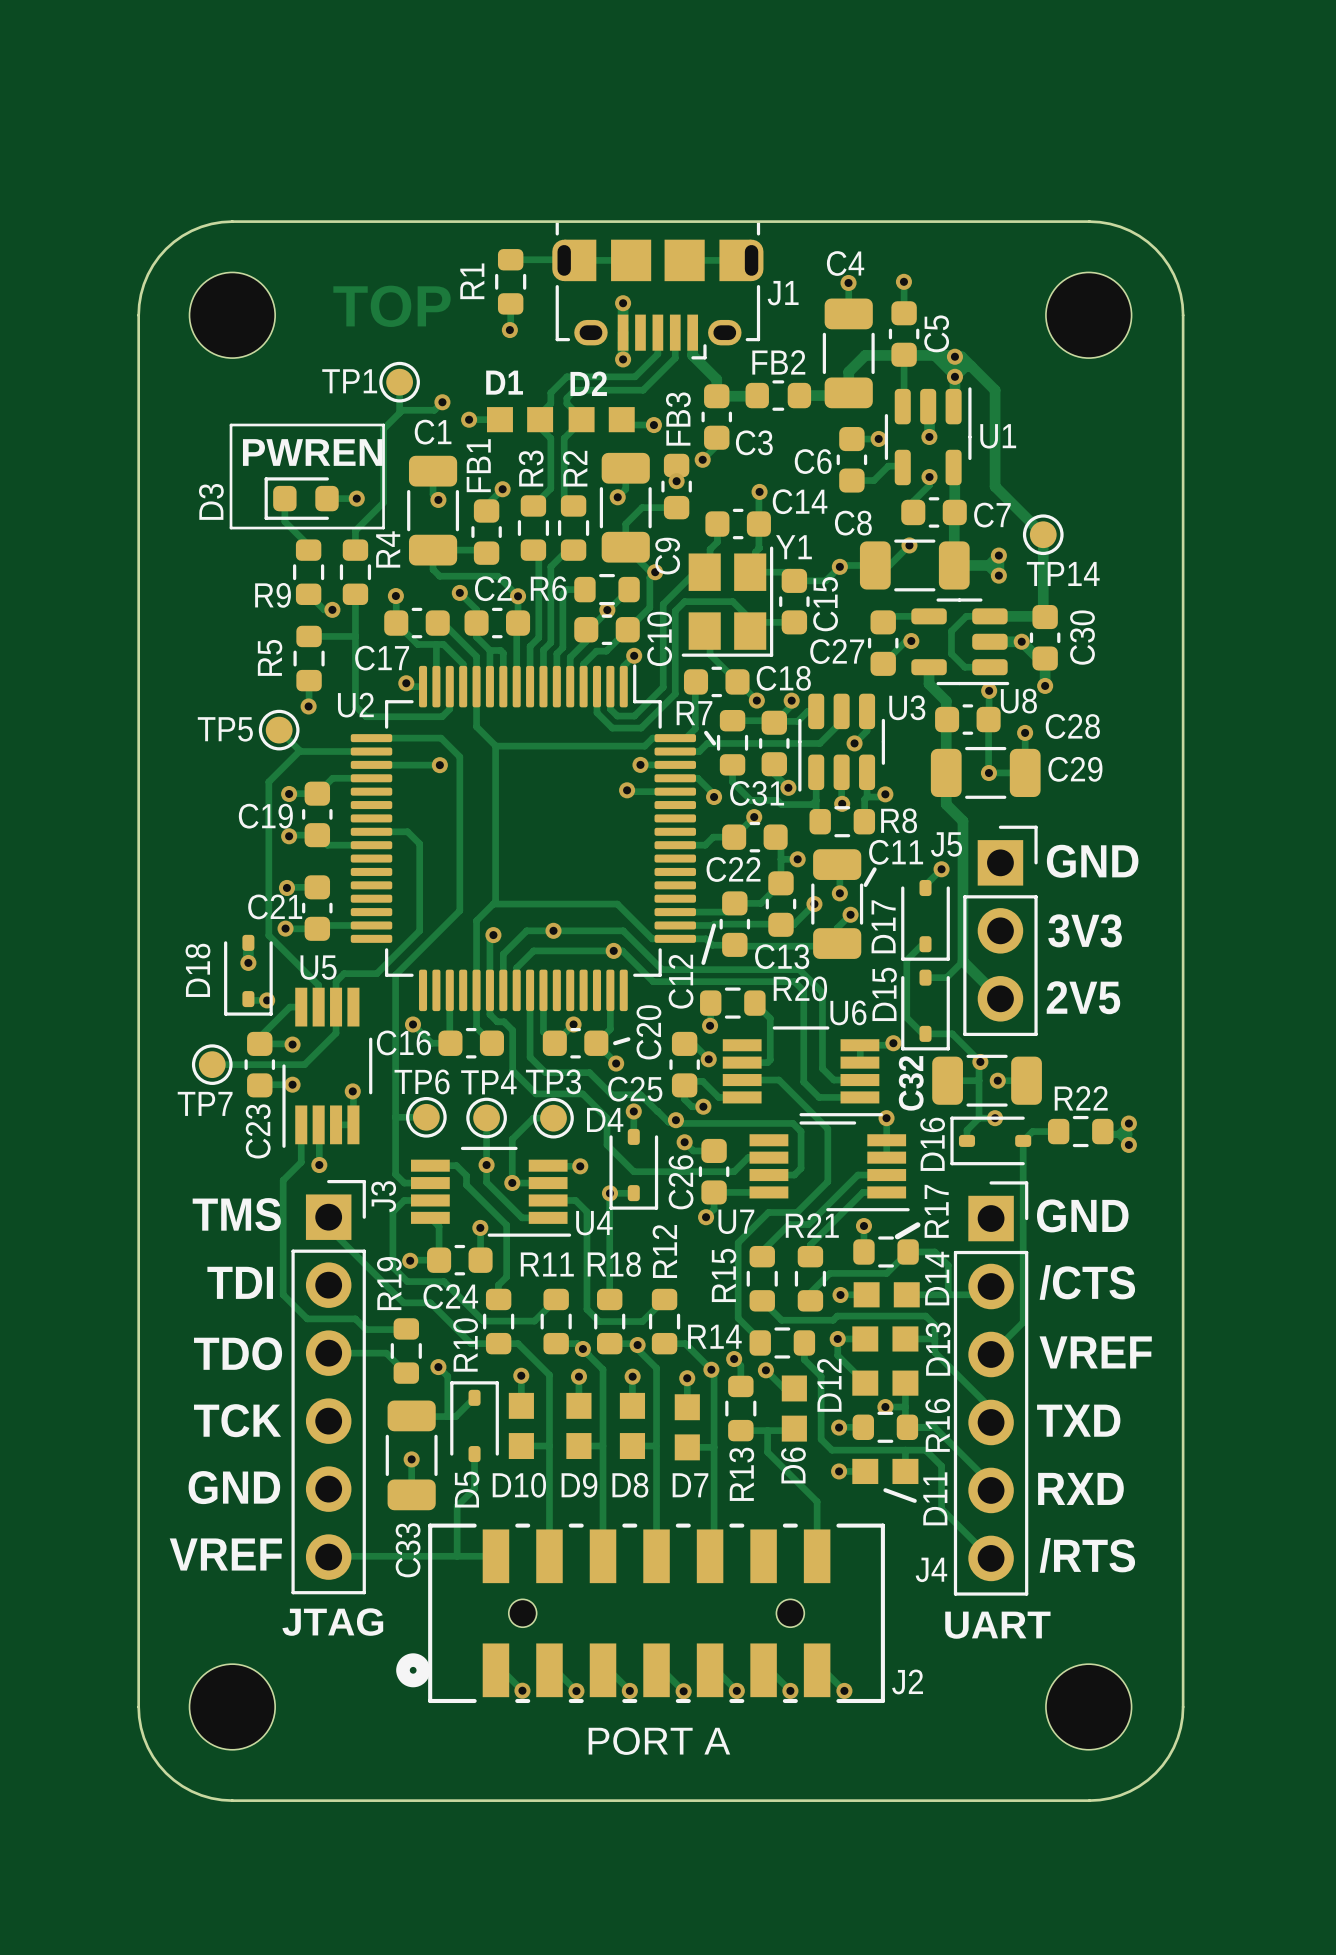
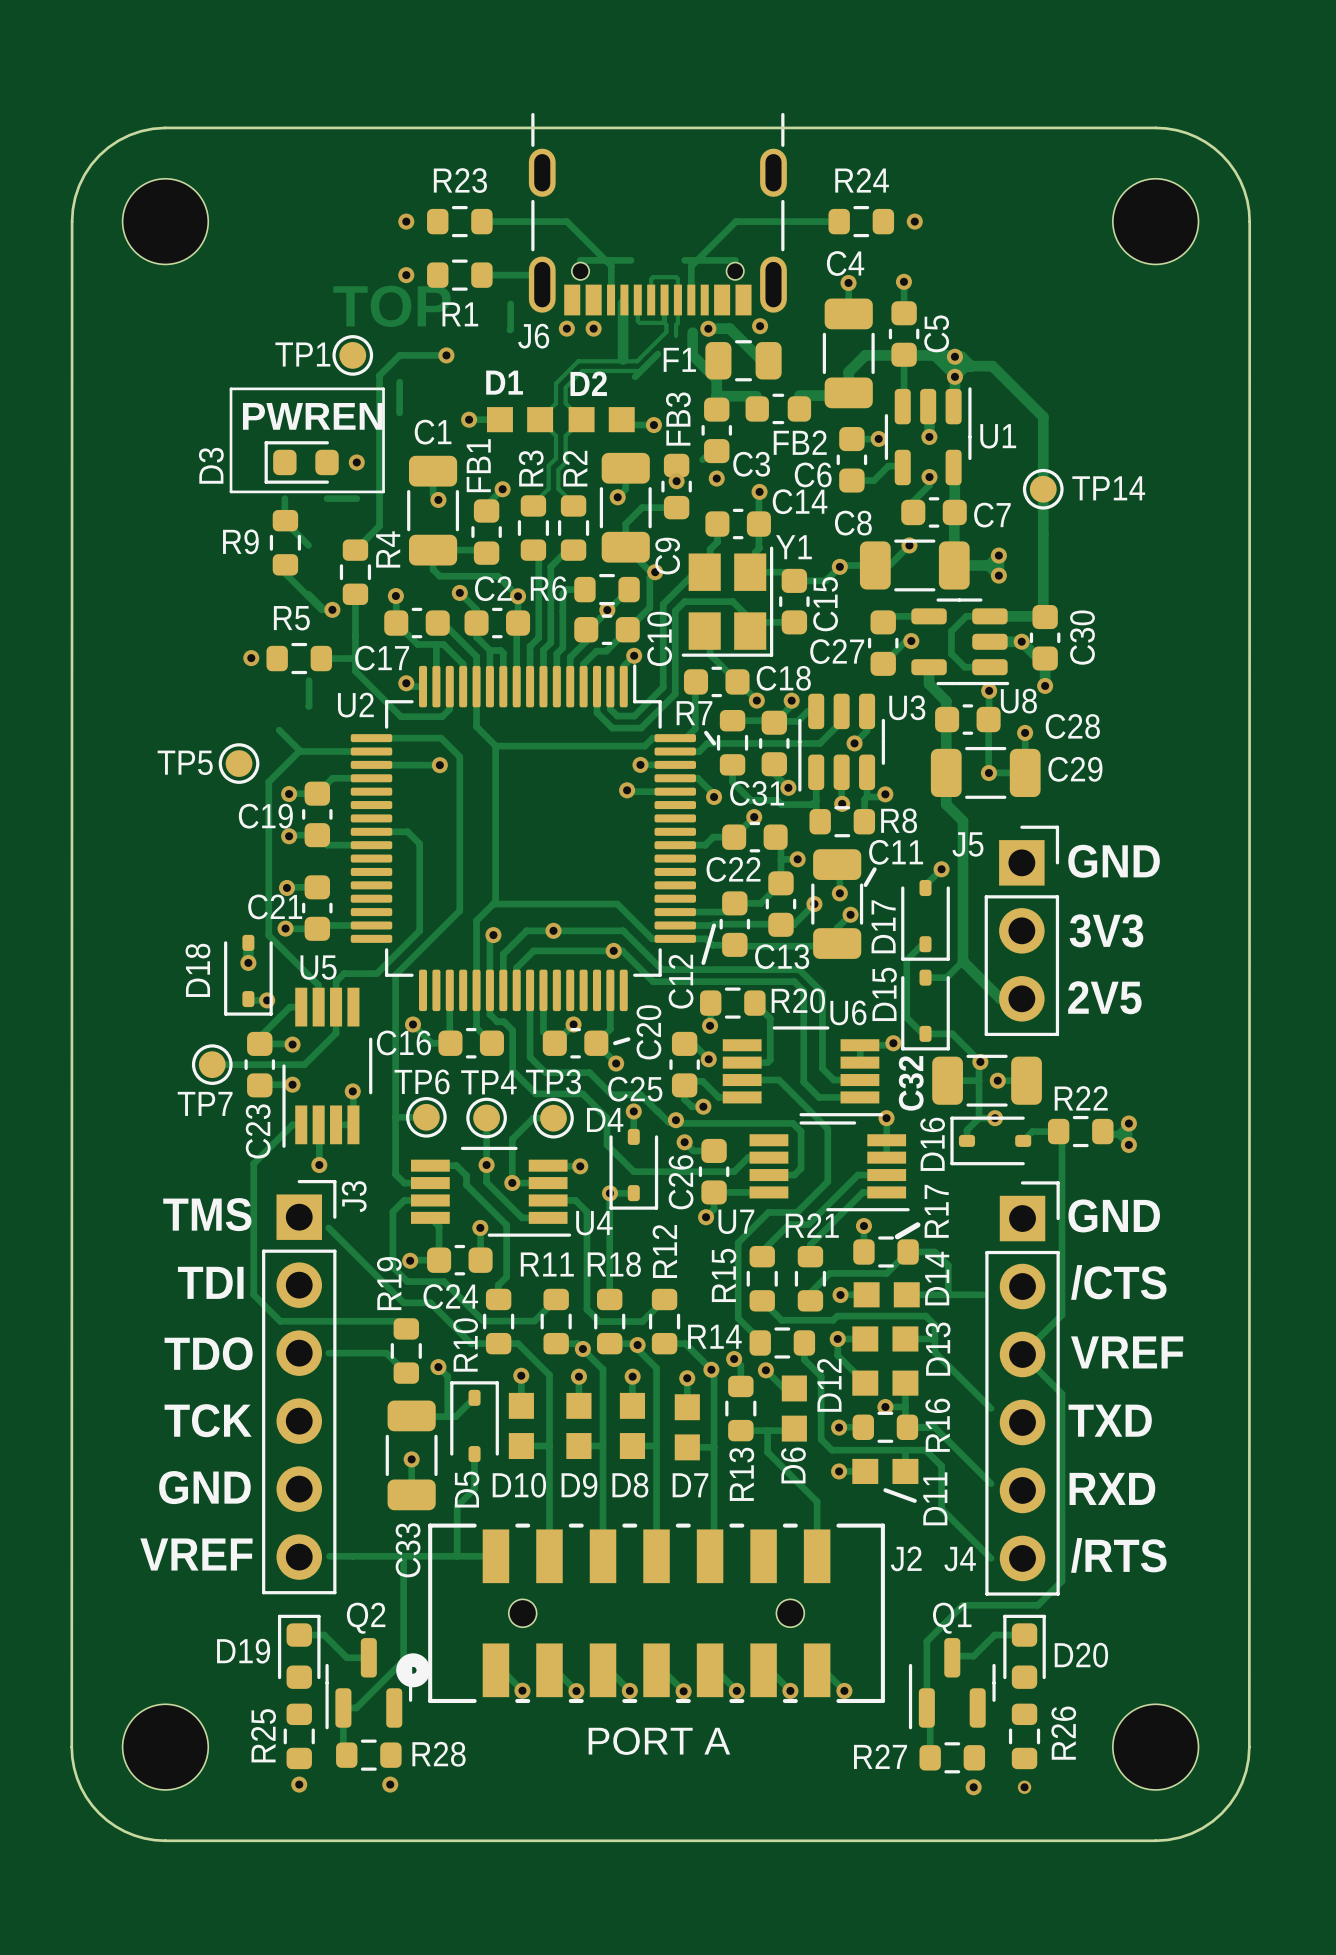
J6: none -> (657, 214)
board edge: (232, 221) (1089, 221) (1110, 223) (1139, 235) (1155, 249) (1168, 265) (1180, 294) (1183, 315) (1183, 1706) (1180, 1727) (1168, 1756) (1155, 1773) (1139, 1786) (1120, 1795) (1089, 1800) (232, 1800) (201, 1795) (182, 1786) (166, 1773) (153, 1756) (141, 1727) (138, 1706) (138, 315) (141, 294) (147, 274) (166, 249) (191, 230) (211, 223) (232, 221) -> (165, 127) (140, 131) (129, 135) (118, 140) (99, 155) (84, 174) (79, 185) (75, 197) (72, 221) (71, 1747) (74, 1767) (86, 1796) (99, 1813) (115, 1826) (144, 1838) (165, 1840) (1155, 1840) (1179, 1837) (1202, 1828) (1221, 1813) (1236, 1793) (1246, 1771) (1249, 1747) (1249, 221) (1247, 200) (1235, 171) (1222, 155) (1205, 142) (1176, 130) (1155, 127) (165, 127)
via: none -> (406, 221)
R23: none -> (459, 221)
track: none -> (481, 221) (566, 221) (611, 266) (611, 299)
track: none -> (839, 221) (736, 221) (691, 266) (691, 300)
R24: none -> (861, 221)
via: none -> (914, 221)
track: (510, 259) (563, 259) -> none
via: none -> (406, 275)
track: none -> (481, 275) (532, 275) (542, 284)
R1 name position: R1 (472, 281) -> R1 (460, 314)
R1 rotation: 0° (510, 281) -> 90° clockwise (459, 275)
R1 position: (510, 281) -> (459, 275)
J1: (657, 290) -> none
track: none -> (637, 300) (637, 320) (639, 322) (662, 322) (664, 320)
track: none -> (651, 300) (651, 279) (653, 277) (676, 277) (677, 279) (676, 336)
via: (623, 303) -> none
part position: (232, 315) -> (165, 221)
part position: (1088, 315) -> (1155, 221)
via: none -> (760, 326)
via: none -> (566, 328)
via: none -> (593, 328)
via: none -> (708, 328)
track: none -> (714, 328) (729, 328) (768, 367)
via: (509, 330) -> none
track: (675, 332) (675, 358) (643, 390) (574, 390) (566, 398) (566, 403) (581, 418) -> none
via: none -> (446, 355)
via: (623, 359) -> none
F1: none -> (743, 360)
FB2 name position: FB2 (778, 362) -> FB2 (800, 442)
track: (971, 366) (995, 390) (995, 486) (1043, 534) -> (971, 366) (992, 366) (1043, 416) (1043, 534)
track: (635, 376) (566, 376) (550, 392) (550, 403) (540, 414) -> none
TP1 position: (399, 382) -> (352, 355)
FB2 position: (778, 395) -> (778, 408)
track: (442, 402) (434, 410) (402, 410) (383, 429) (383, 502) (355, 530) (355, 550) -> (446, 355) (399, 355) (379, 375) (379, 526) (355, 550)
via: (442, 402) -> none
C3 position: (716, 416) -> (716, 430)
track: (581, 420) (564, 438) (564, 496) (573, 505) -> (641, 370) (582, 370) (565, 387) (565, 403) (581, 420) (565, 435) (565, 462) (558, 469) (558, 488) (573, 505)
line: (231, 425) (383, 425) -> (231, 425) (231, 388) (383, 388) (383, 425)
track: (540, 427) (550, 438) (550, 488) (533, 505) -> (664, 300) (666, 332) (637, 361) (578, 361) (556, 383) (556, 403) (540, 419) (556, 435) (556, 458) (548, 465) (548, 488) (533, 505)
C3 name position: C3 (754, 442) -> C3 (751, 464)
text position: PWREN (312, 452) -> PWREN (312, 416)
via position: (702, 459) -> (716, 478)
C6 name position: C6 (813, 461) -> C6 (813, 474)
line: (231, 491) (231, 528) (383, 528) (383, 491) -> (231, 491) (383, 491)
D3 position: (301, 498) -> (301, 462)
via position: (356, 498) -> (356, 462)
TP14 position: (1043, 534) -> (1043, 489)
track: none -> (285, 564) (285, 573) (321, 609)
R9 position: (308, 572) -> (285, 542)
TP14 name position: TP14 (1063, 573) -> TP14 (1108, 488)
R9 name position: R9 (273, 595) -> R9 (240, 541)
track: (309, 636) (355, 636) -> none
R5 rotation: 0° (309, 658) -> 90° clockwise (299, 658)
track: none -> (321, 658) (353, 658) (355, 660)
track: (355, 671) (355, 706) (366, 716) (400, 716) -> (355, 671) (400, 716)
via position: (308, 706) -> (251, 658)
TP5 position: (279, 730) -> (239, 763)
text position: GND (1092, 861) -> GND (1114, 861)
J5 position: (1000, 930) -> (1021, 930)
text position: 3V3 (1085, 930) -> 3V3 (1106, 930)
R20 name position: R20 (800, 988) -> R20 (798, 1000)
text position: 2V5 (1083, 997) -> 2V5 (1104, 997)
track: (301, 1124) (301, 1162) (283, 1180) (283, 1294) (307, 1318) (355, 1318) (366, 1329) (405, 1329) -> (301, 1124) (292, 1124) (253, 1163) (253, 1294) (280, 1321) (403, 1321) (406, 1323)
track: none -> (1058, 1131) (1062, 1134) (1062, 1315) (1022, 1354) (1062, 1393) (1062, 1581) (1037, 1605) (962, 1605) (926, 1641) (926, 1707) (930, 1711) (930, 1757)
track: (1023, 1140) (1023, 1322) (991, 1354) -> none
text position: TMS (236, 1214) -> TMS (207, 1214)
text position: GND (1082, 1215) -> GND (1114, 1215)
text position: TDI (240, 1282) -> TDI (210, 1282)
text position: /CTS (1087, 1282) -> /CTS (1118, 1282)
text position: VREF (1095, 1352) -> VREF (1127, 1352)
text position: TDO (238, 1353) -> TDO (208, 1353)
J3 position: (328, 1387) -> (299, 1387)
J4 position: (991, 1388) -> (1022, 1388)
text position: TCK (237, 1420) -> TCK (208, 1420)
text position: TXD (1078, 1420) -> TXD (1110, 1420)
text position: GND (234, 1487) -> GND (204, 1487)
text position: RXD (1080, 1488) -> RXD (1112, 1488)
text position: VREF (225, 1554) -> VREF (196, 1554)
text position: /RTS (1087, 1555) -> /RTS (1118, 1555)
track: none -> (403, 1556) (403, 1660) (356, 1707) (343, 1707) (343, 1751) (346, 1755)
J4 name position: J4 (931, 1569) -> J4 (960, 1559)
text: JTAG (332, 1622) -> none
text: UART (997, 1625) -> none
track: none -> (299, 1635) (324, 1635) (346, 1657) (368, 1657)
track: none -> (1024, 1635) (994, 1635) (973, 1656) (953, 1656) (952, 1657)
D19: none -> (299, 1651)
D20: none -> (1024, 1651)
J2 name position: J2 (907, 1681) -> J2 (906, 1558)
Q2: none -> (368, 1683)
Q1: none -> (952, 1683)
part position: (232, 1706) -> (165, 1747)
part position: (1088, 1706) -> (1155, 1747)
R25: none -> (299, 1736)
R26: none -> (1024, 1736)
R28: none -> (368, 1755)
R27: none -> (952, 1757)
via: none -> (299, 1784)
via: none -> (390, 1784)
via: none -> (973, 1787)
via: none -> (1024, 1787)

